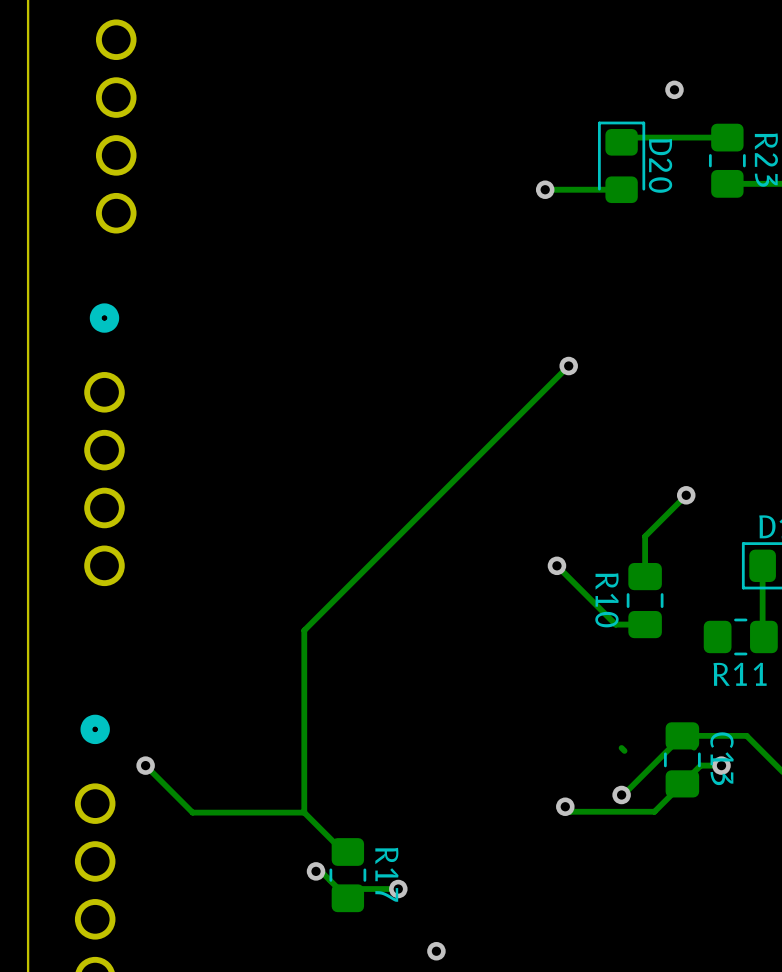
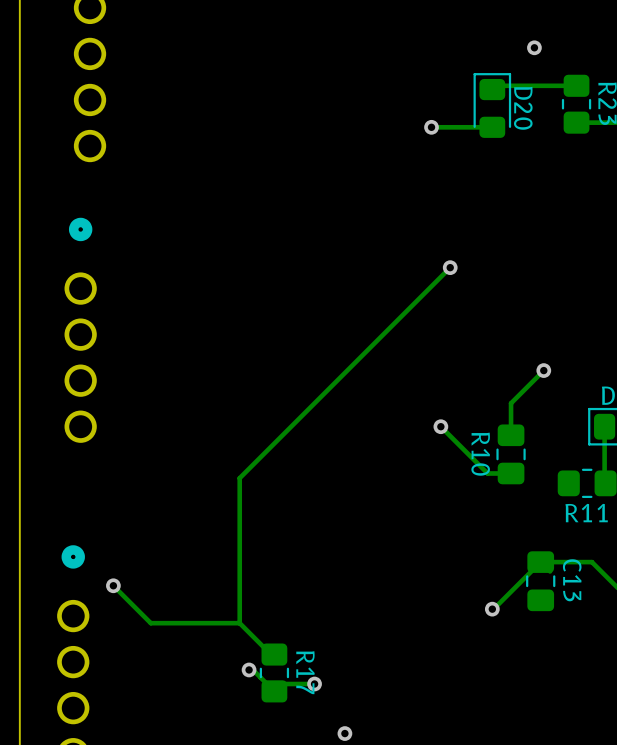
track: (621, 747) (624, 750) -> none
track: (721, 765) (700, 765) (654, 811) (570, 811) (562, 806) -> none
via: (721, 765) -> none
via: (565, 806) -> none

